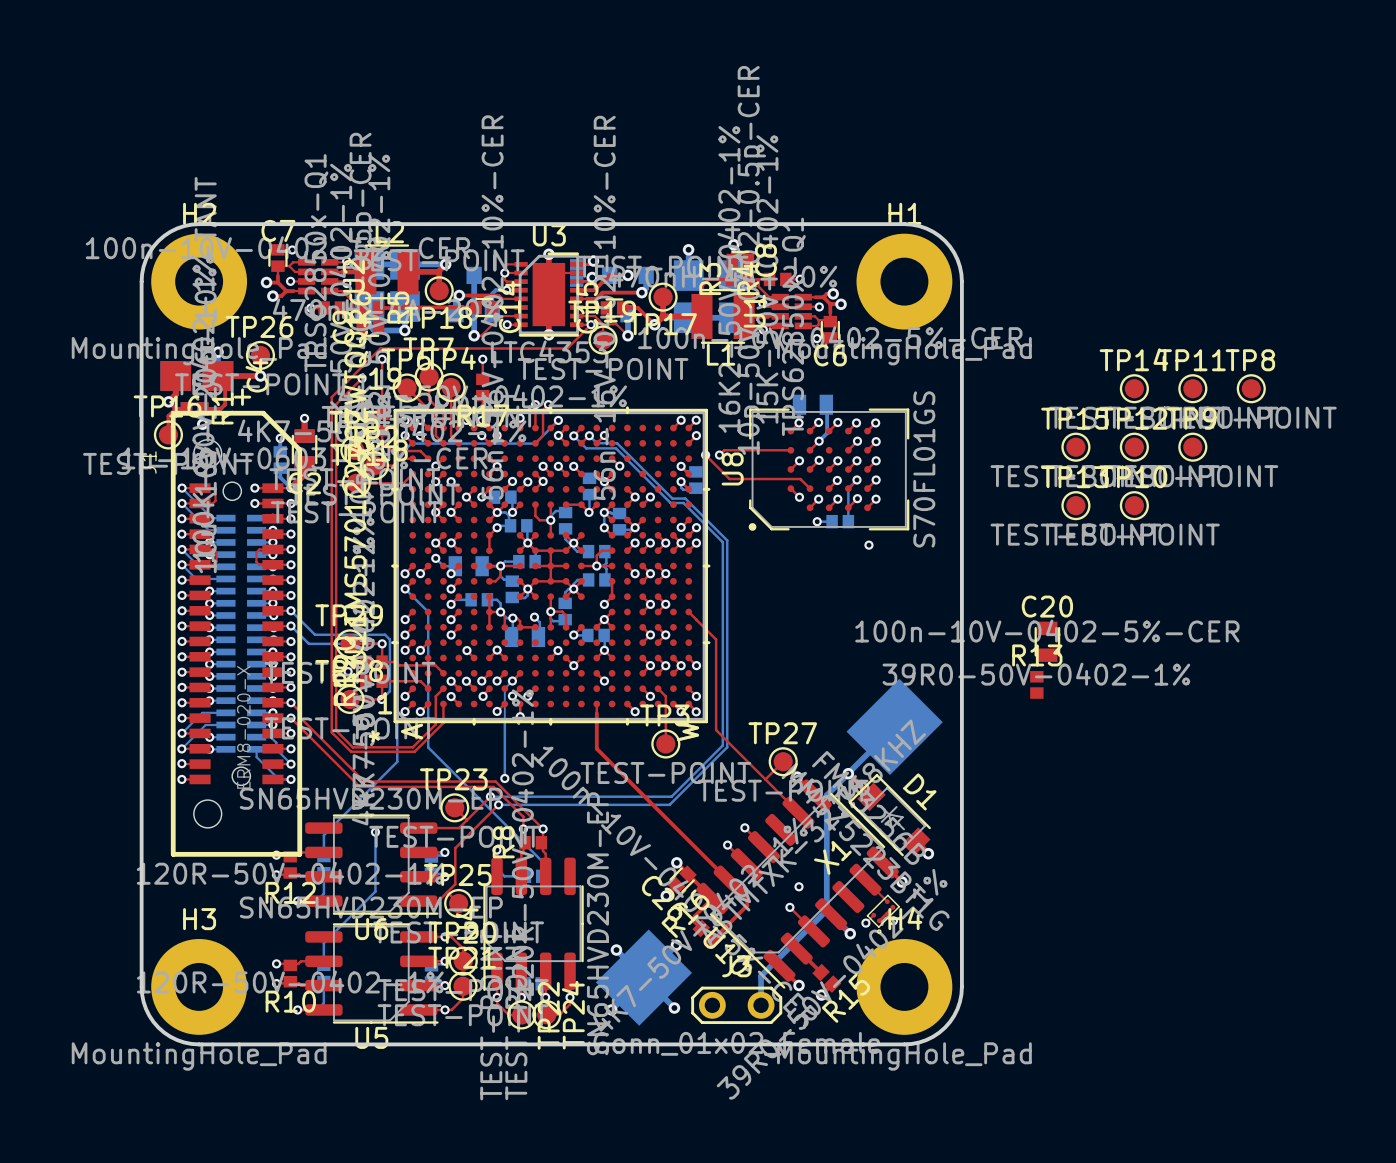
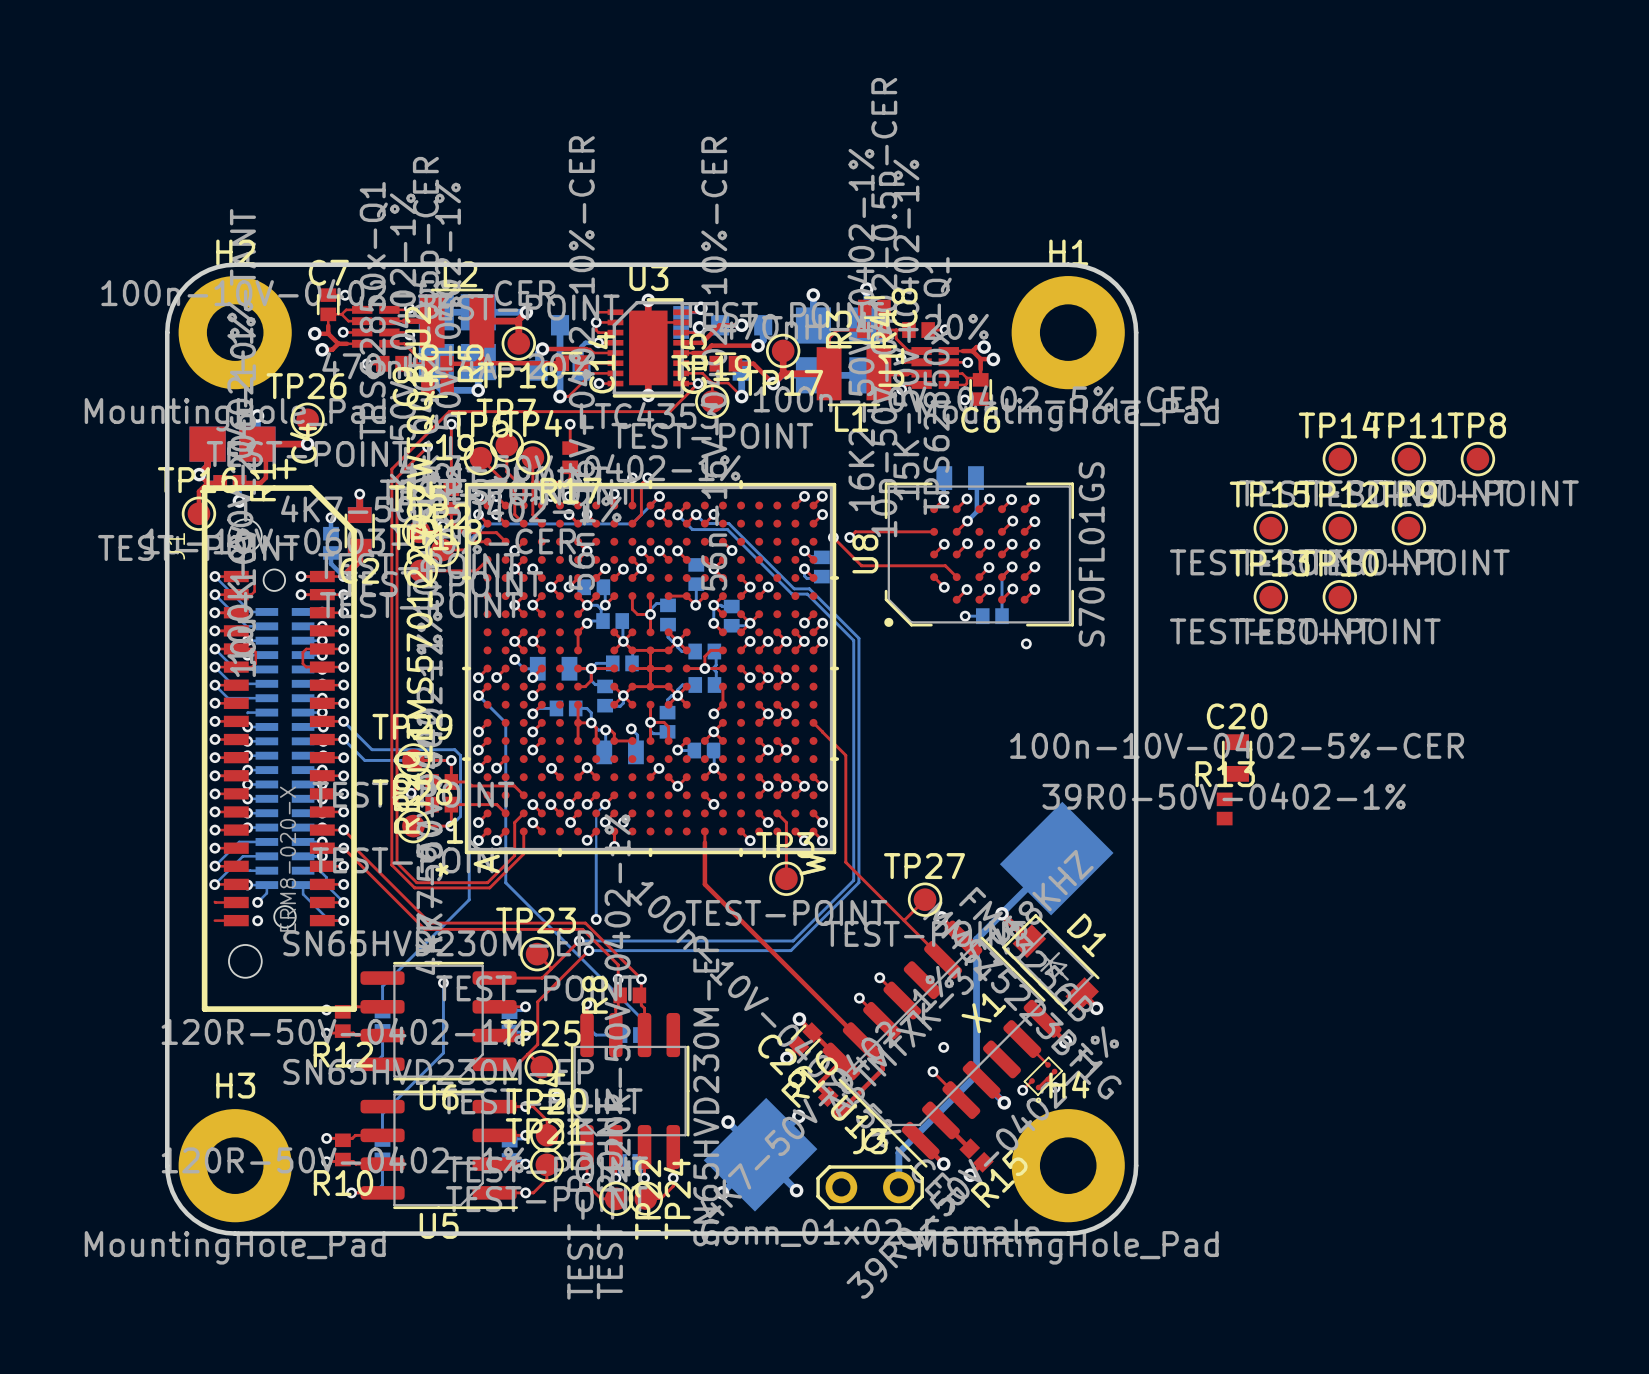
bottom track: none -> (215, 685) (228, 698) (247, 698)
via: (209, 591) -> none
via: (209, 603) -> none
via: (209, 737) -> none
bottom track: none -> (266, 885) (266, 893) (257, 902)
via: (181, 763) -> none
via: none -> (257, 902)
via: (181, 779) -> none
via: none -> (257, 920)

